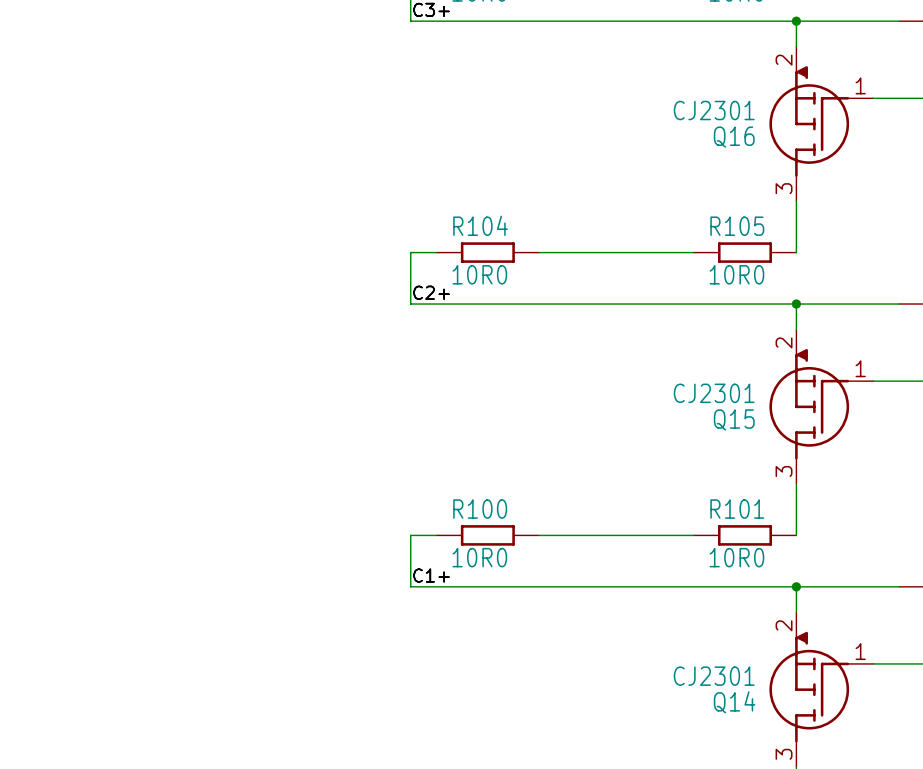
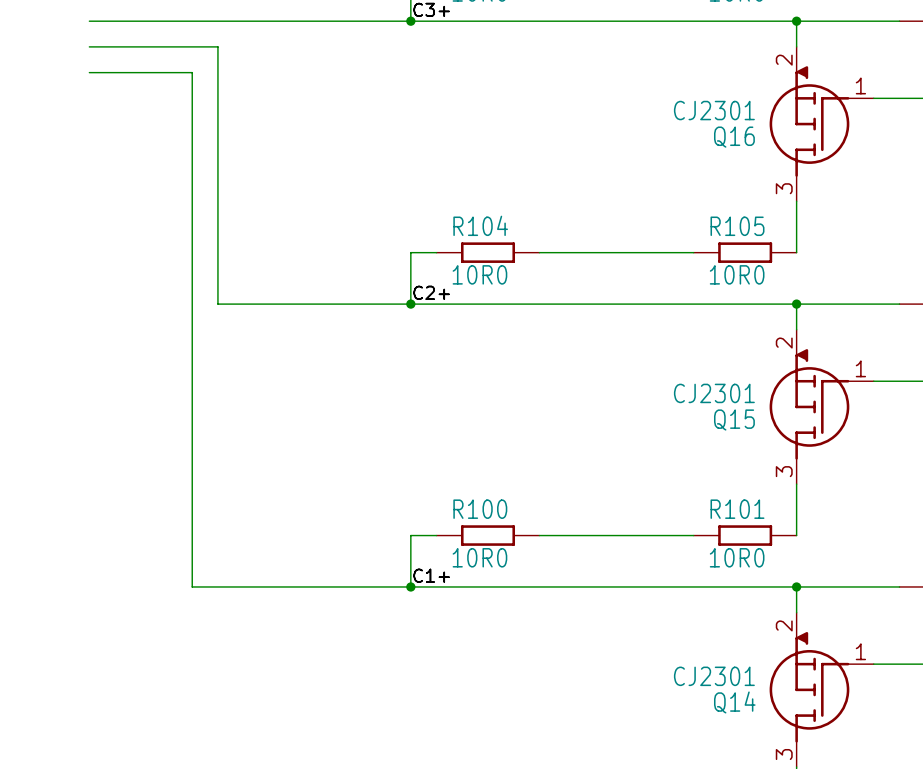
wire: none -> (89, 21) (410, 21)
junction: none -> (410, 21)
wire: none -> (89, 46) (217, 46) (217, 304) (410, 304)
wire: none -> (89, 72) (192, 72) (192, 586) (410, 586)
junction: none -> (410, 304)
junction: none -> (410, 586)

